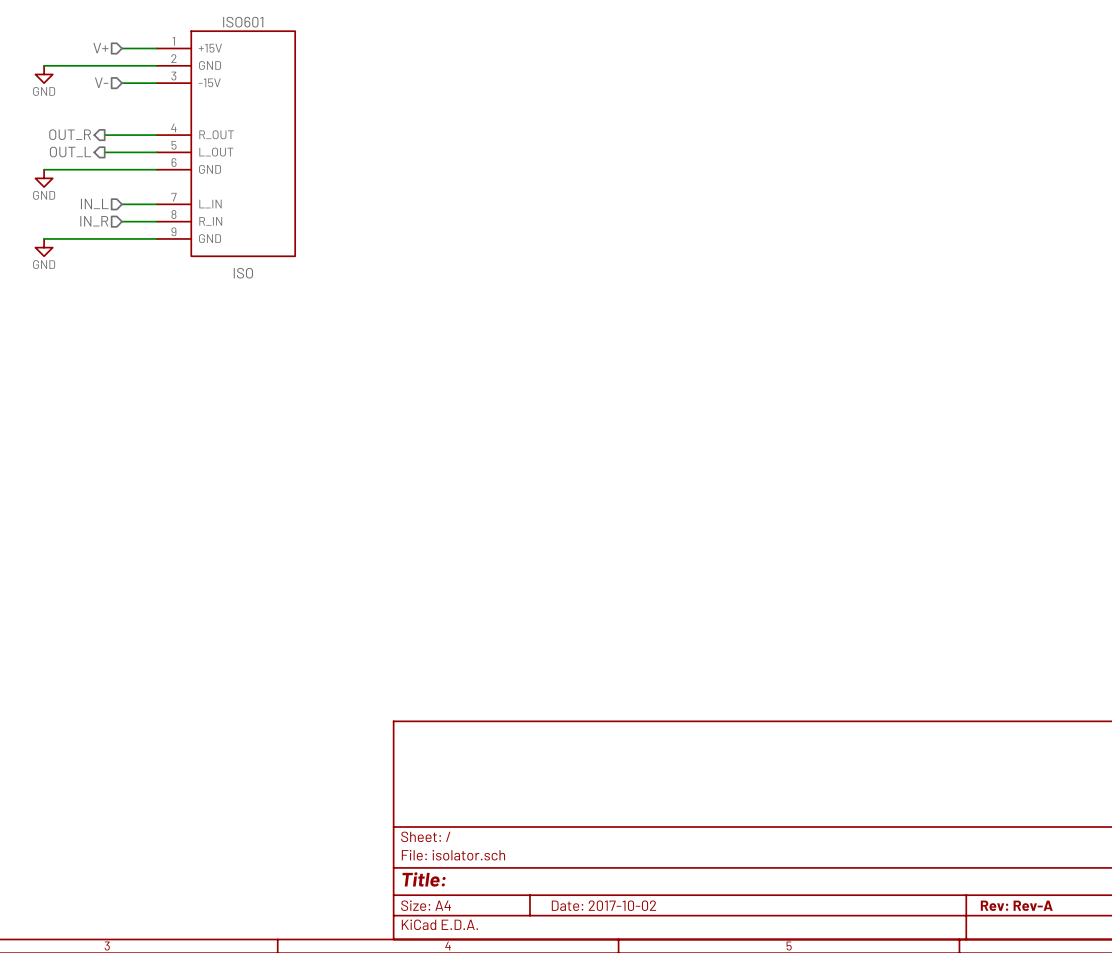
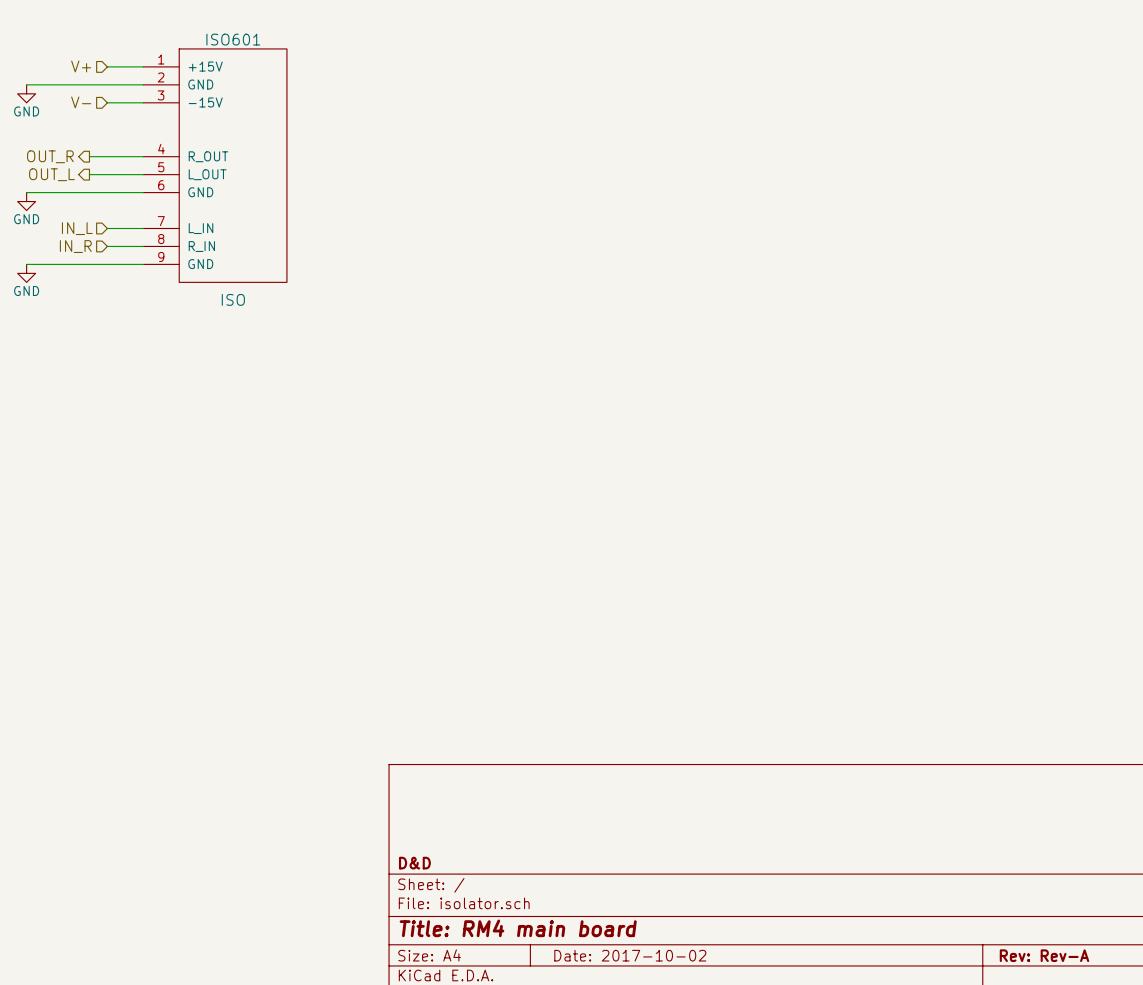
title block: none -> D&D (414, 863)
title block: Title: (424, 879) -> Title: RM4 main board (518, 928)

